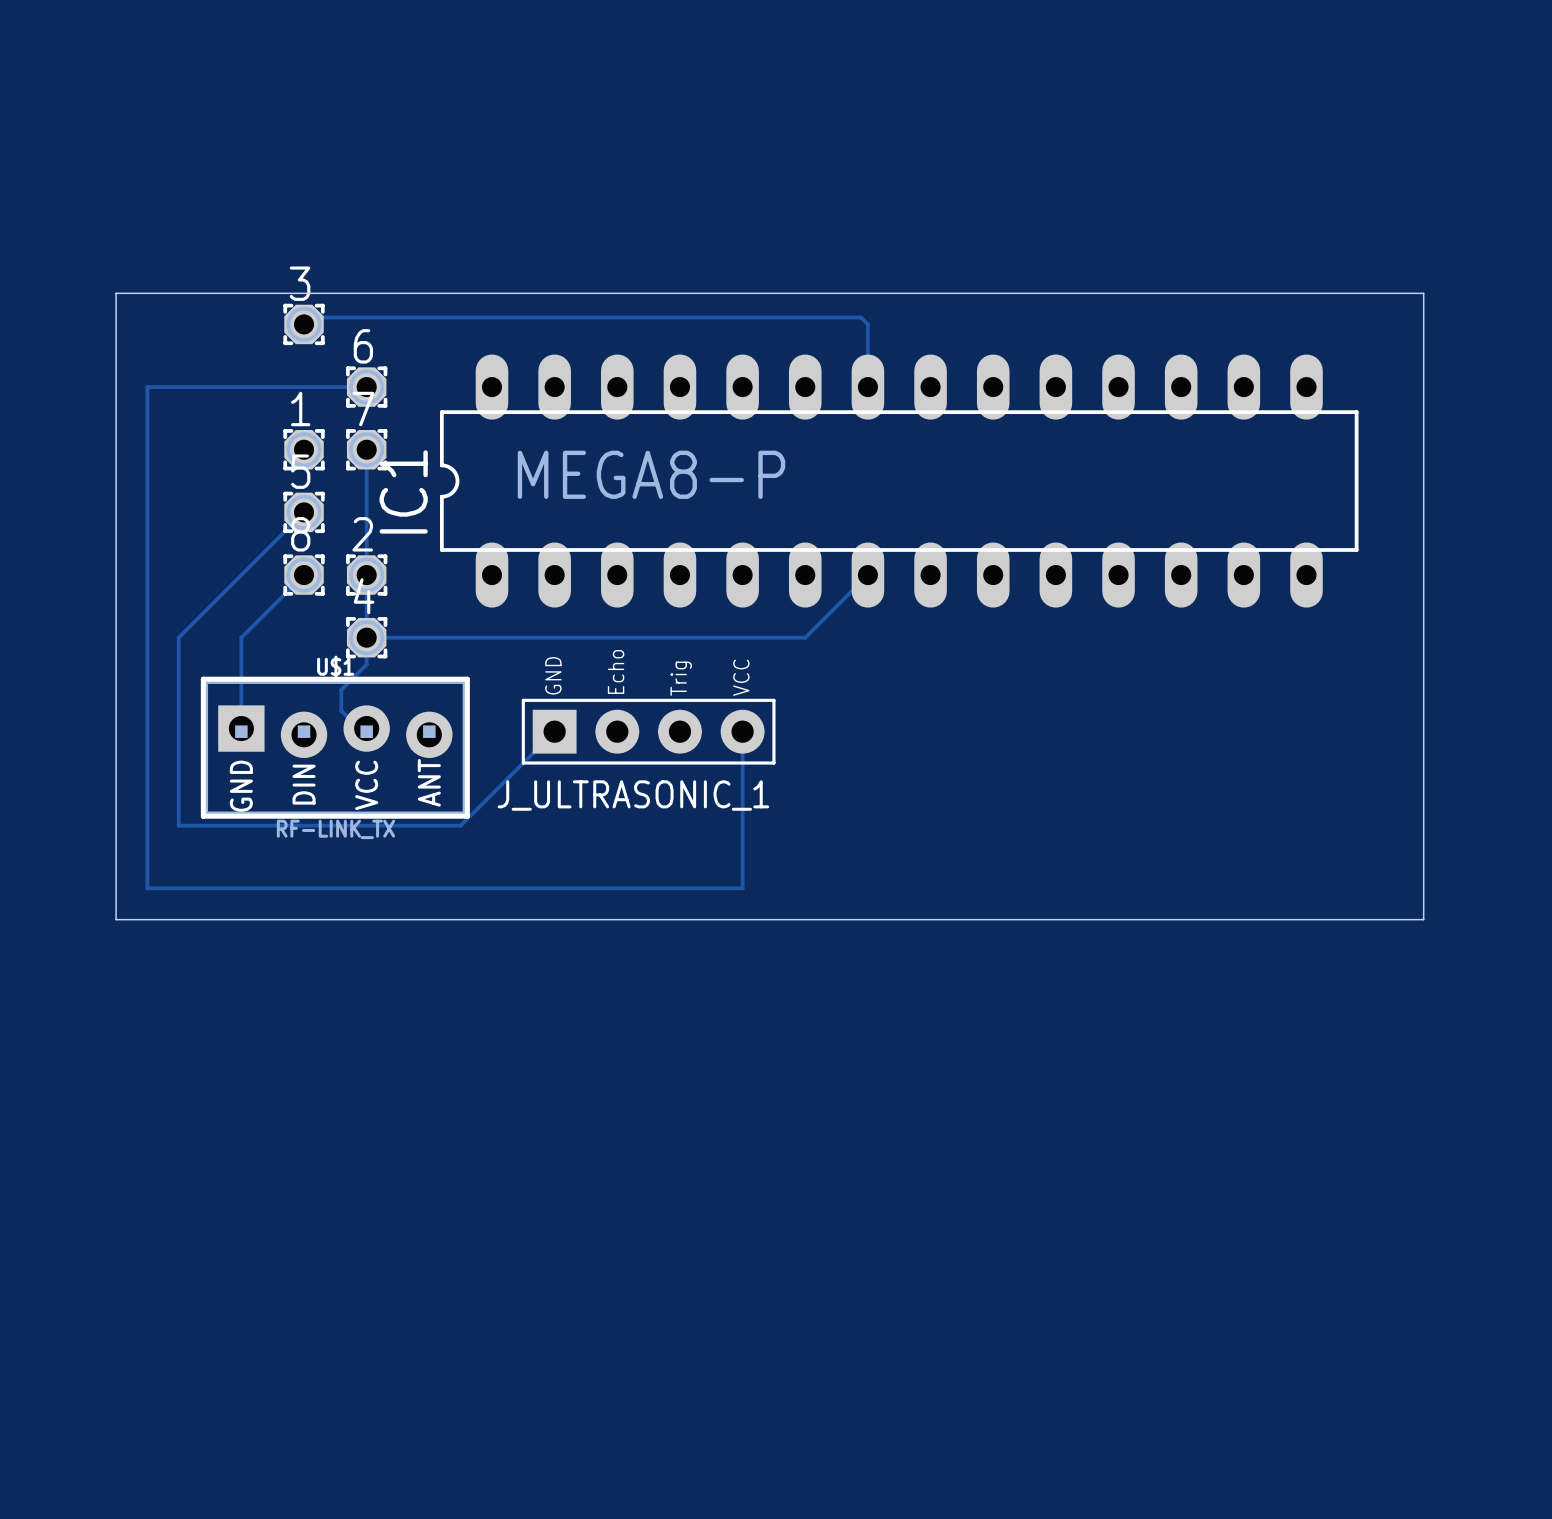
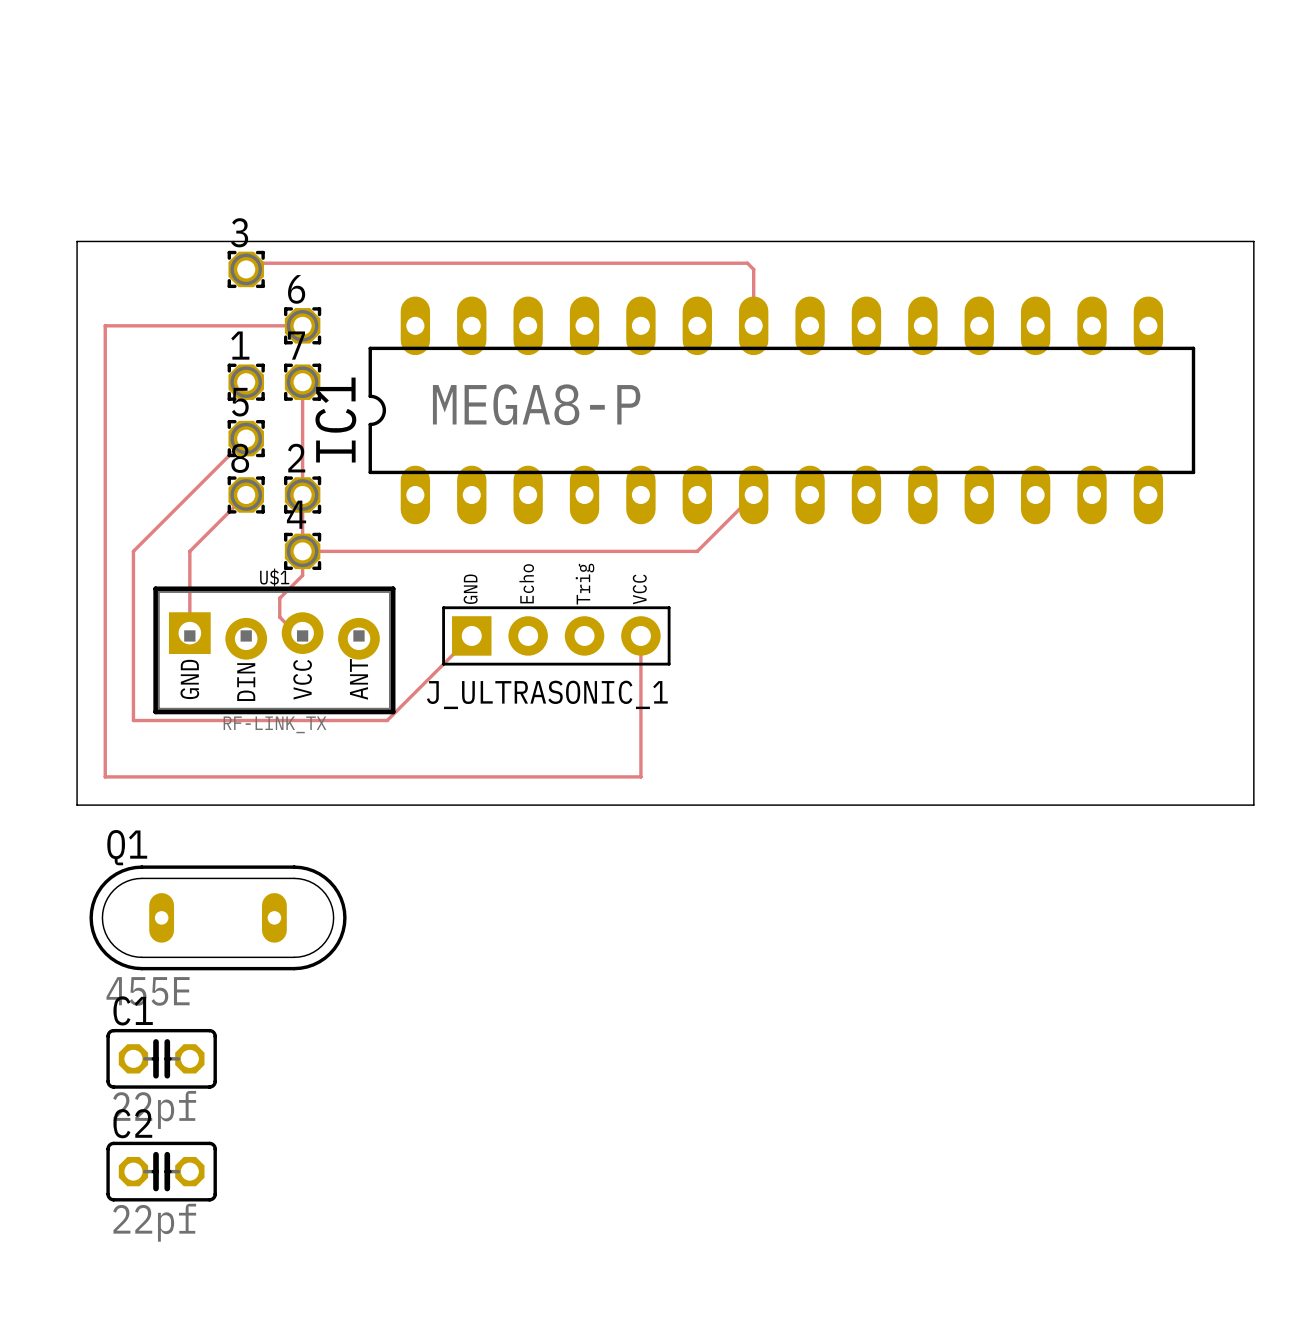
Q1: none -> 455E (218, 917)
C1: none -> 22pf (161, 1058)
C2: none -> 22pf (161, 1171)

